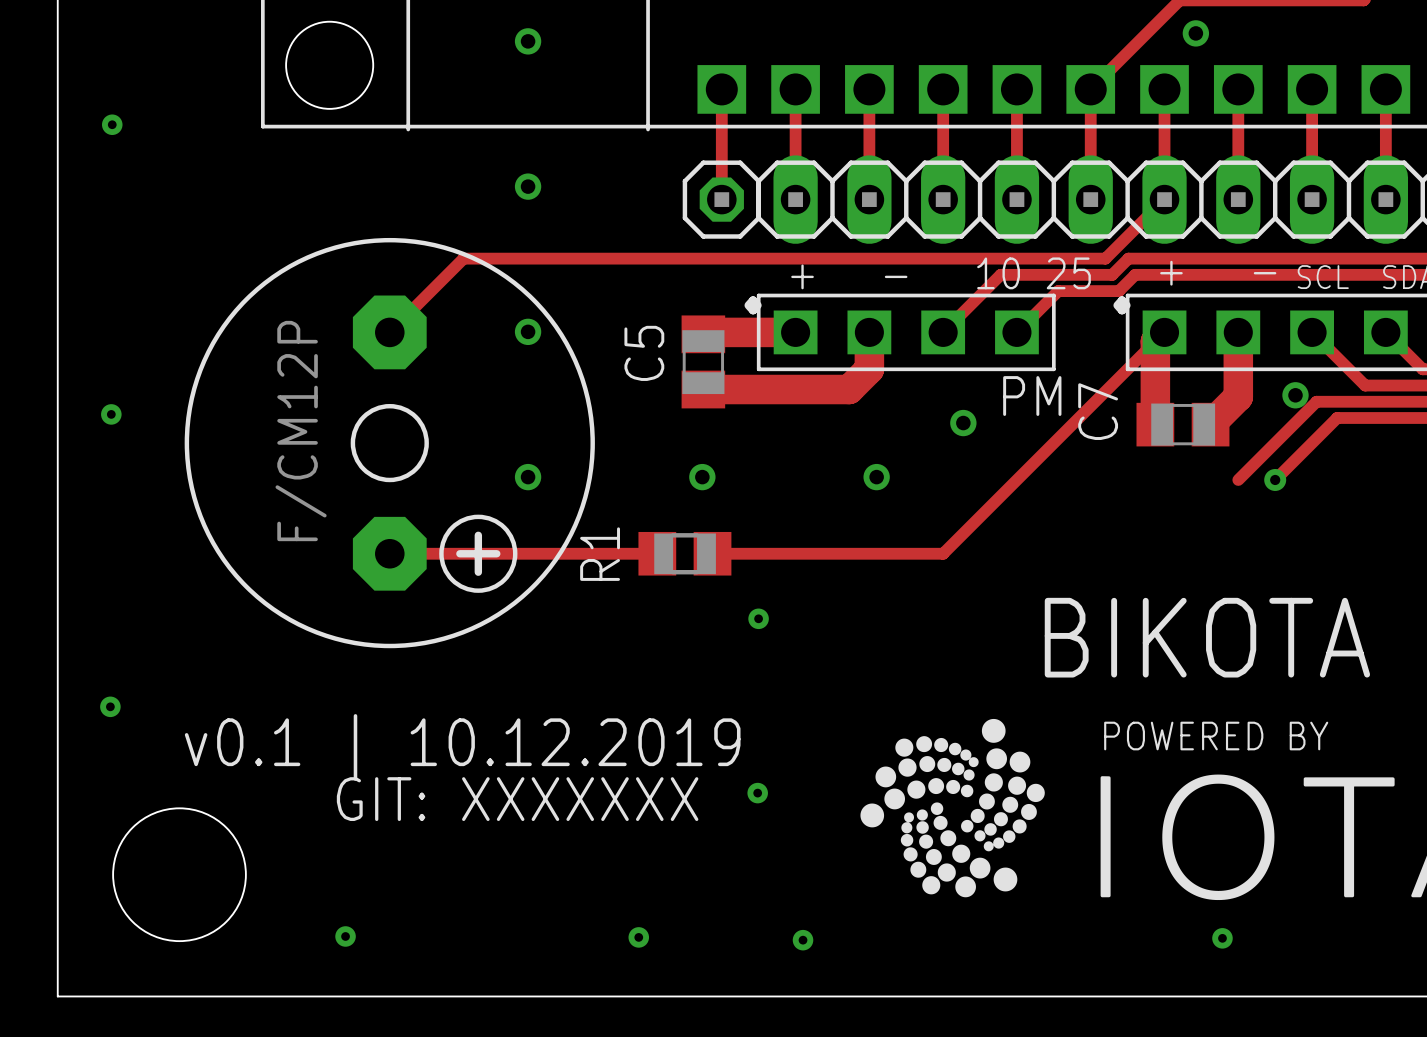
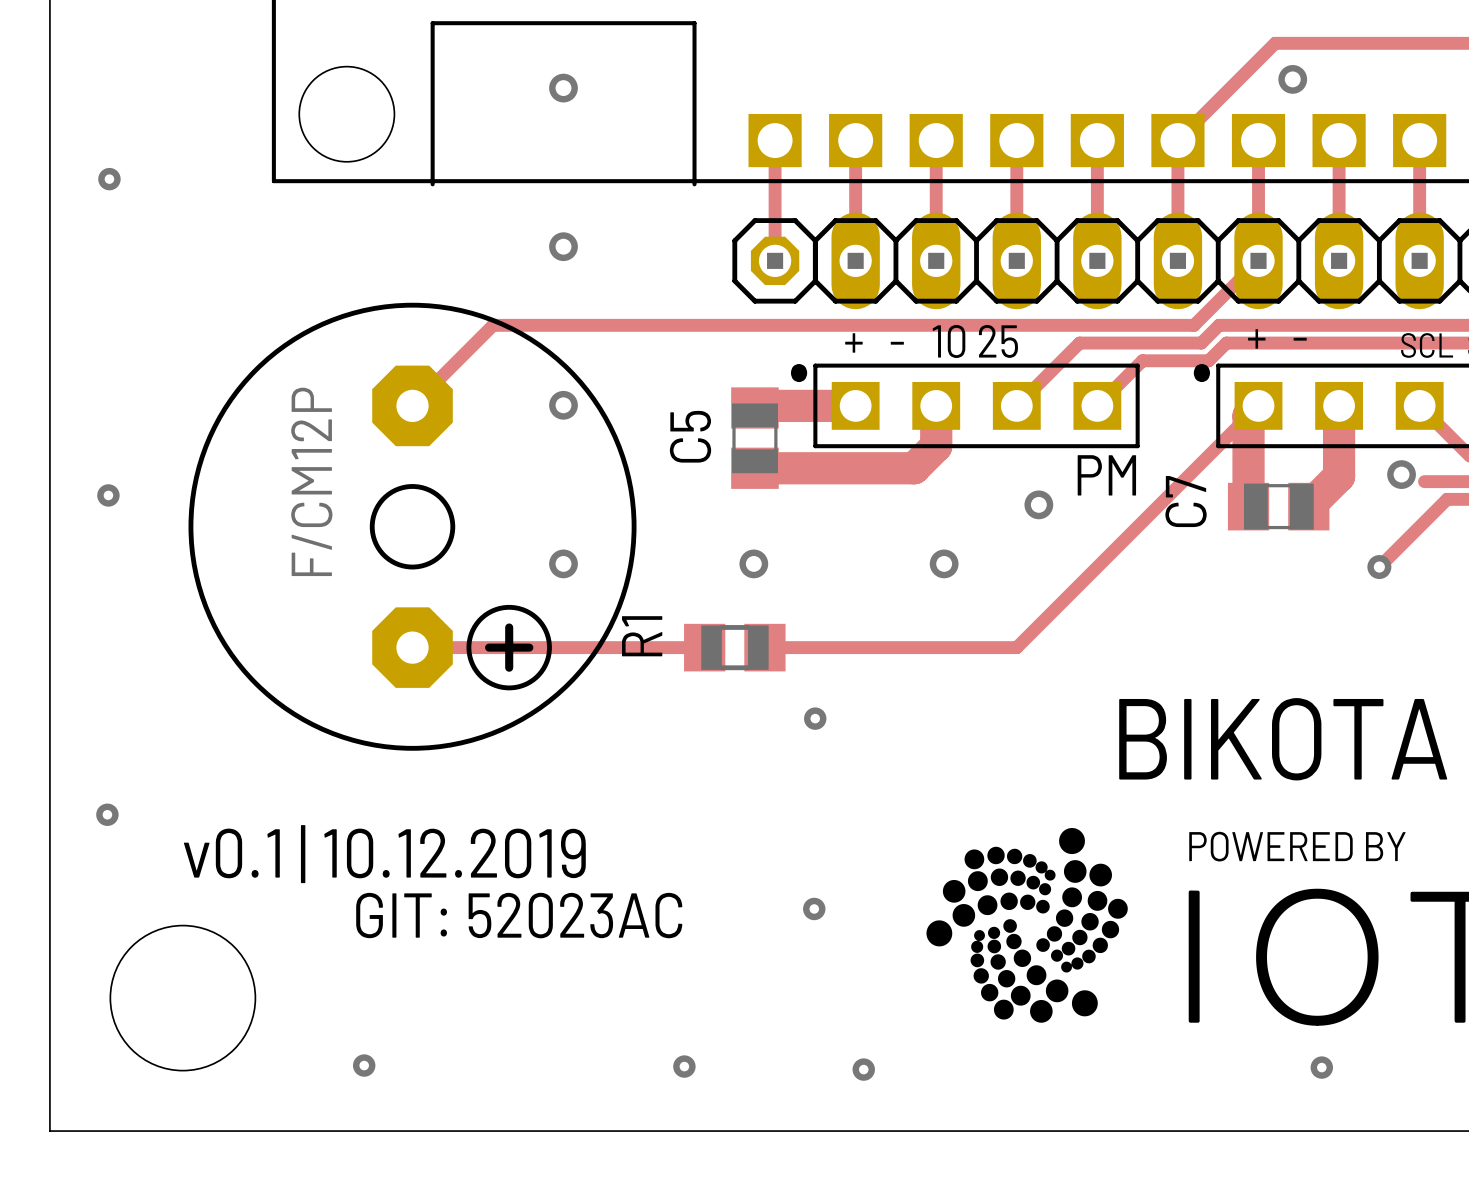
track: (1316, 401) (1238, 479) -> none
text: GIT: XXXXXXX (517, 799) -> GIT: 52023AC (519, 915)

